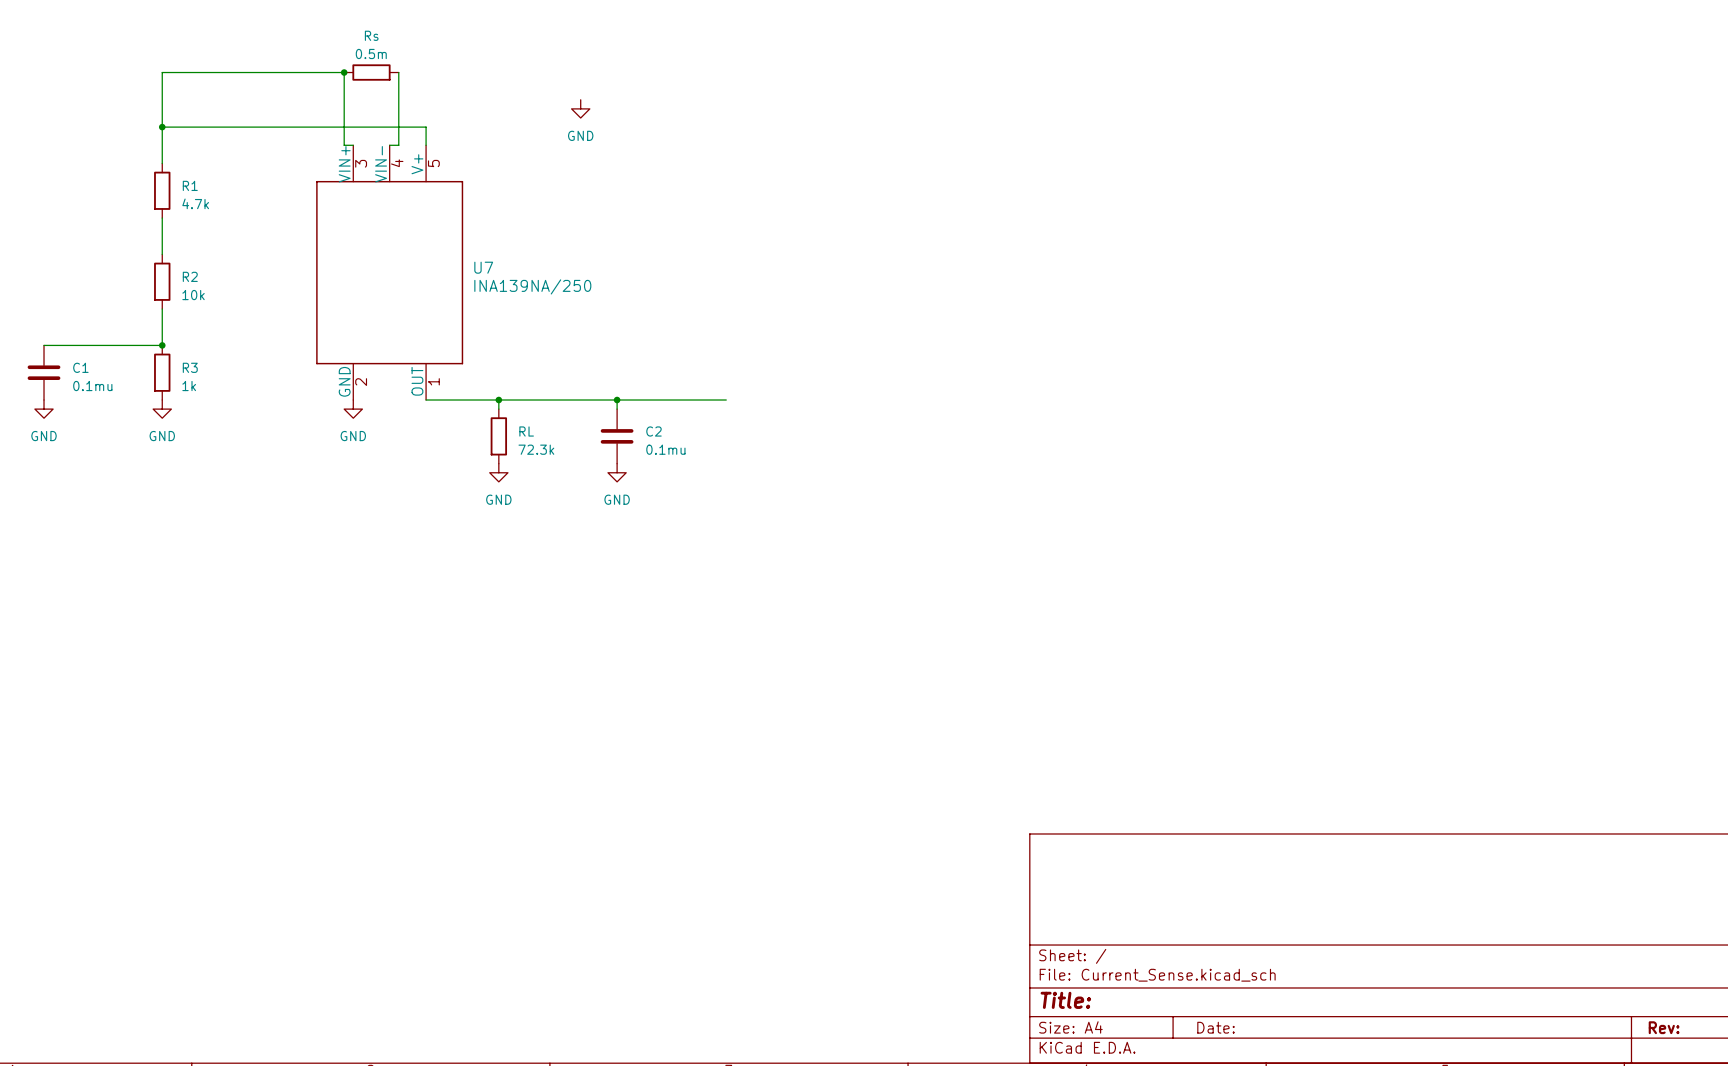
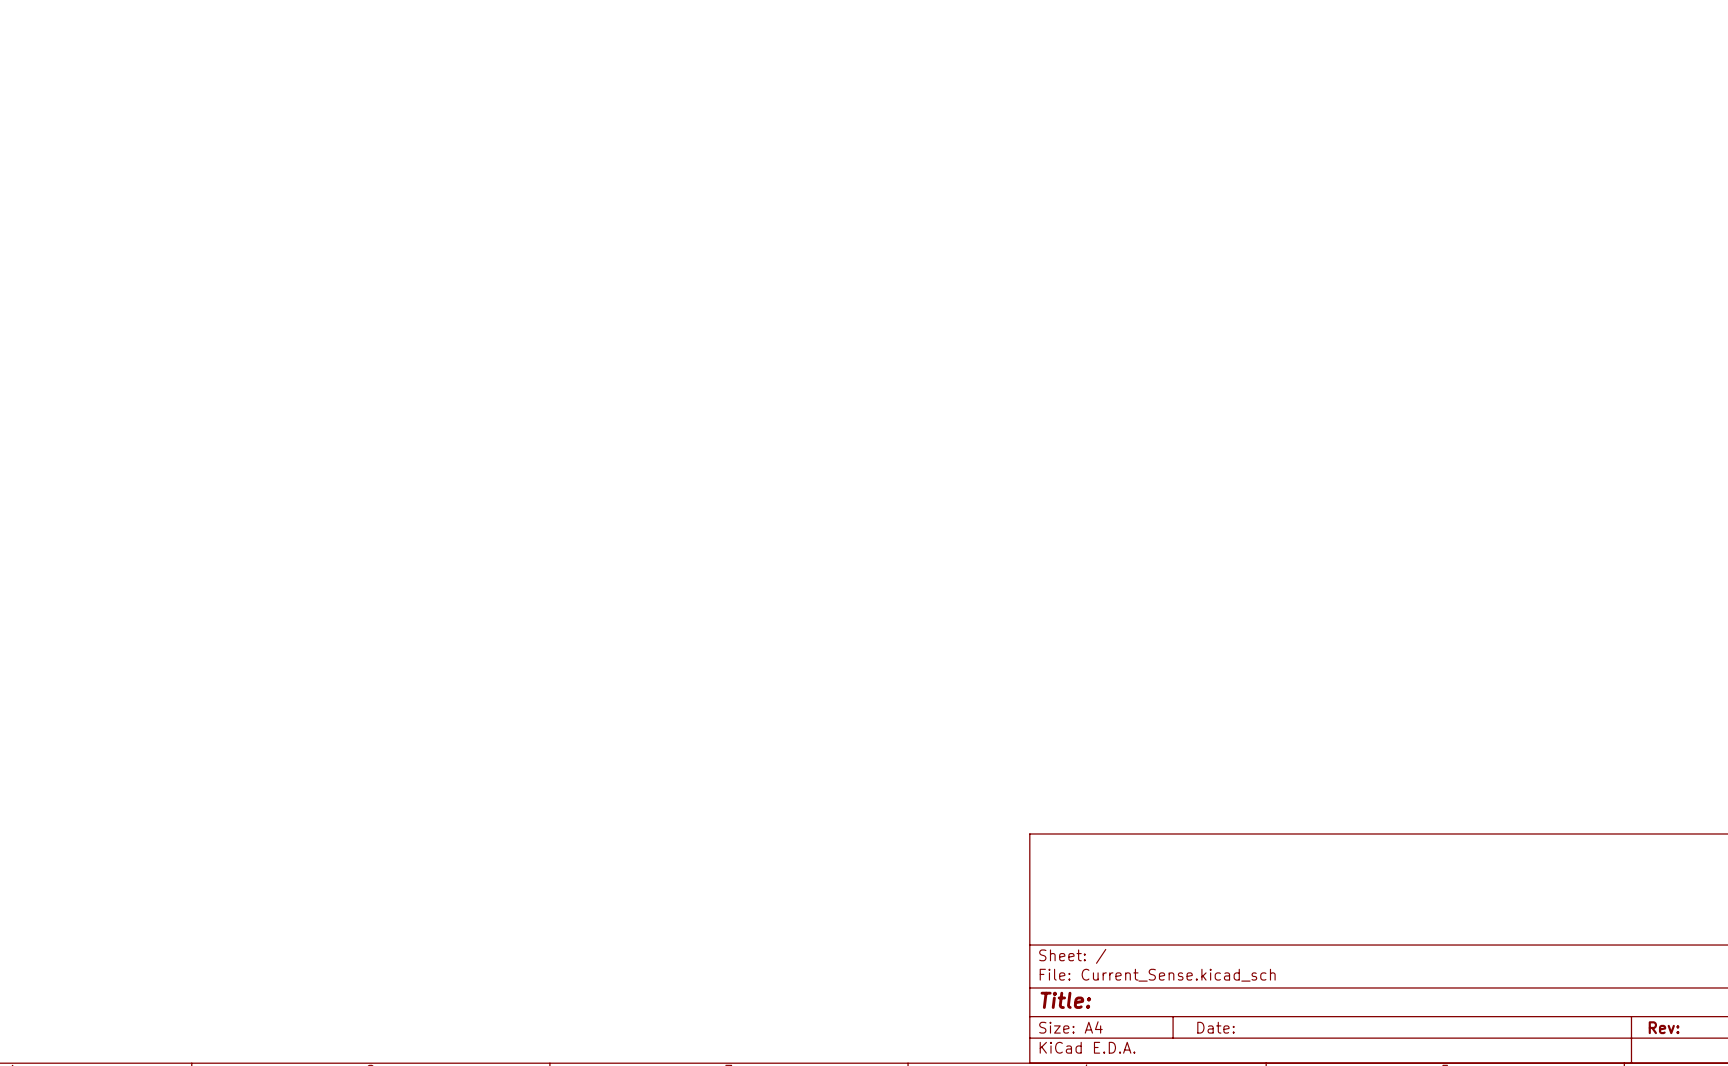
junction: (344, 72) -> none
Rs: 0.5m (371, 72) -> none
wire: (398, 72) (398, 145) (389, 145) -> none
power symbol: GND (580, 108) -> none
wire: (162, 127) (426, 127) (426, 145) -> none
junction: (162, 127) -> none
wire: (353, 145) (344, 145) (344, 72) (162, 72) (162, 163) -> none
R1: 4.7k (162, 190) -> none
wire: (162, 218) (162, 254) -> none
U7: INA139NA/250 (389, 272) -> none
R2: 10k (162, 281) -> none
wire: (162, 309) (162, 345) (44, 345) -> none
junction: (162, 345) -> none
C1: 0.1mu (44, 372) -> none
R3: 1k (162, 372) -> none
wire: (426, 400) (726, 400) -> none
wire: (498, 400) (498, 409) -> none
junction: (498, 400) -> none
wire: (617, 400) (617, 409) -> none
junction: (617, 400) -> none
power symbol: GND (44, 409) -> none
power symbol: GND (162, 409) -> none
power symbol: GND (353, 409) -> none
RL: 72.3k (498, 436) -> none
C2: 0.1mu (617, 436) -> none
power symbol: GND (498, 472) -> none
power symbol: GND (617, 472) -> none

